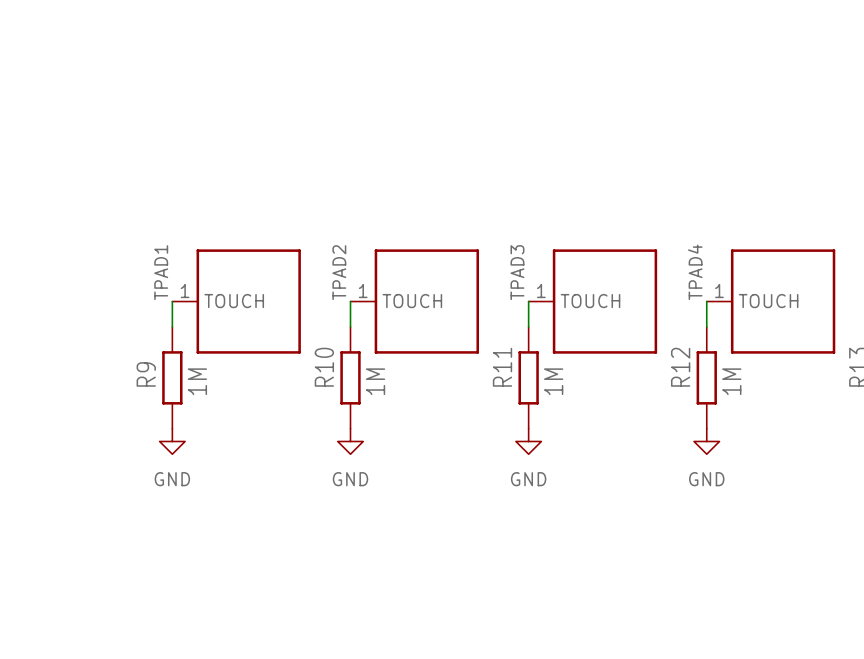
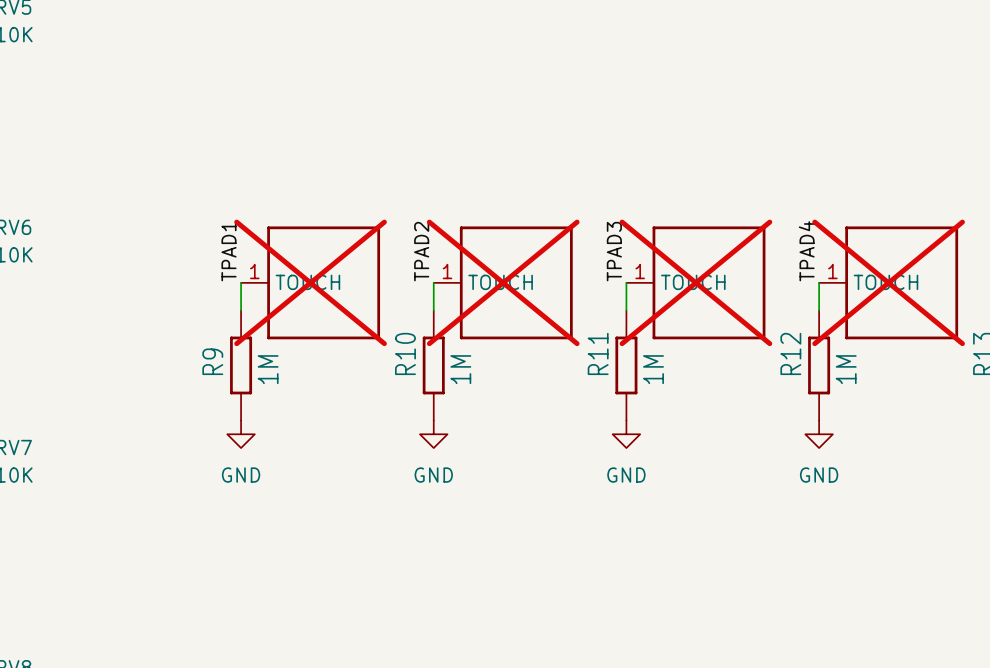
part do-not-place cross: none -> (310, 282)
part do-not-place cross: none -> (503, 282)
part do-not-place cross: none -> (695, 282)
part do-not-place cross: none -> (888, 282)

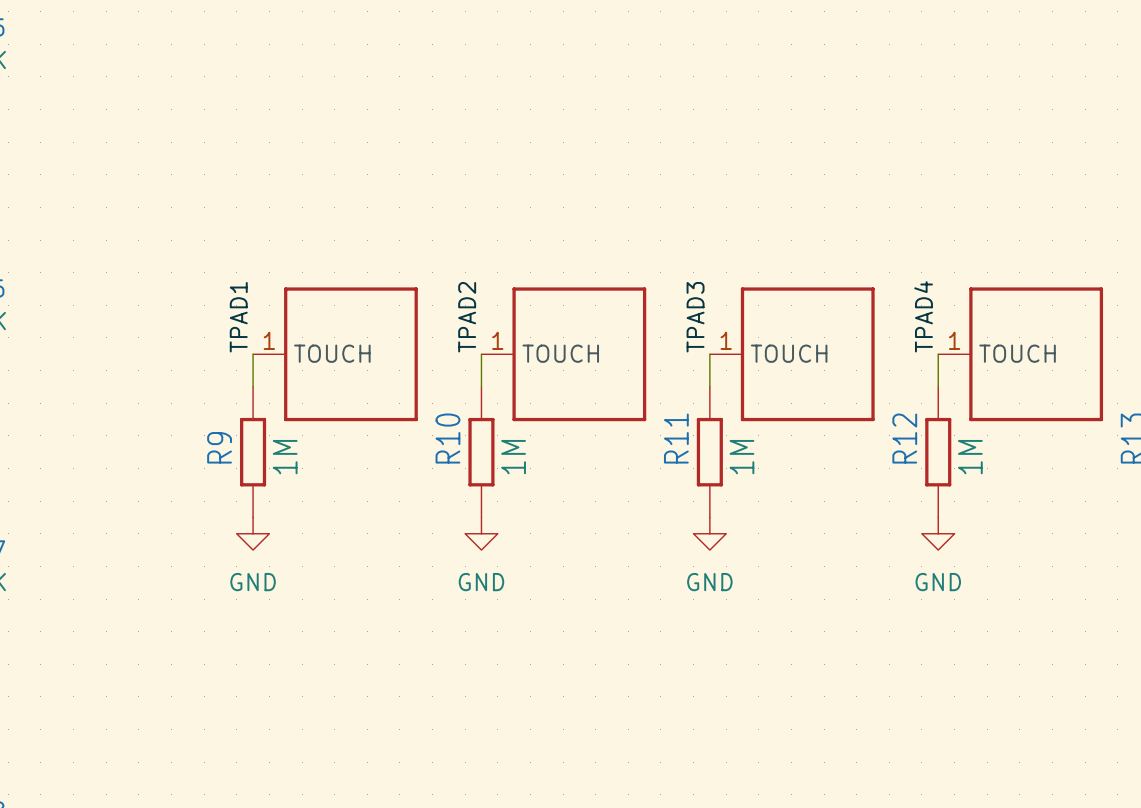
part do-not-place cross: (310, 282) -> none
part do-not-place cross: (503, 282) -> none
part do-not-place cross: (695, 282) -> none
part do-not-place cross: (888, 282) -> none

